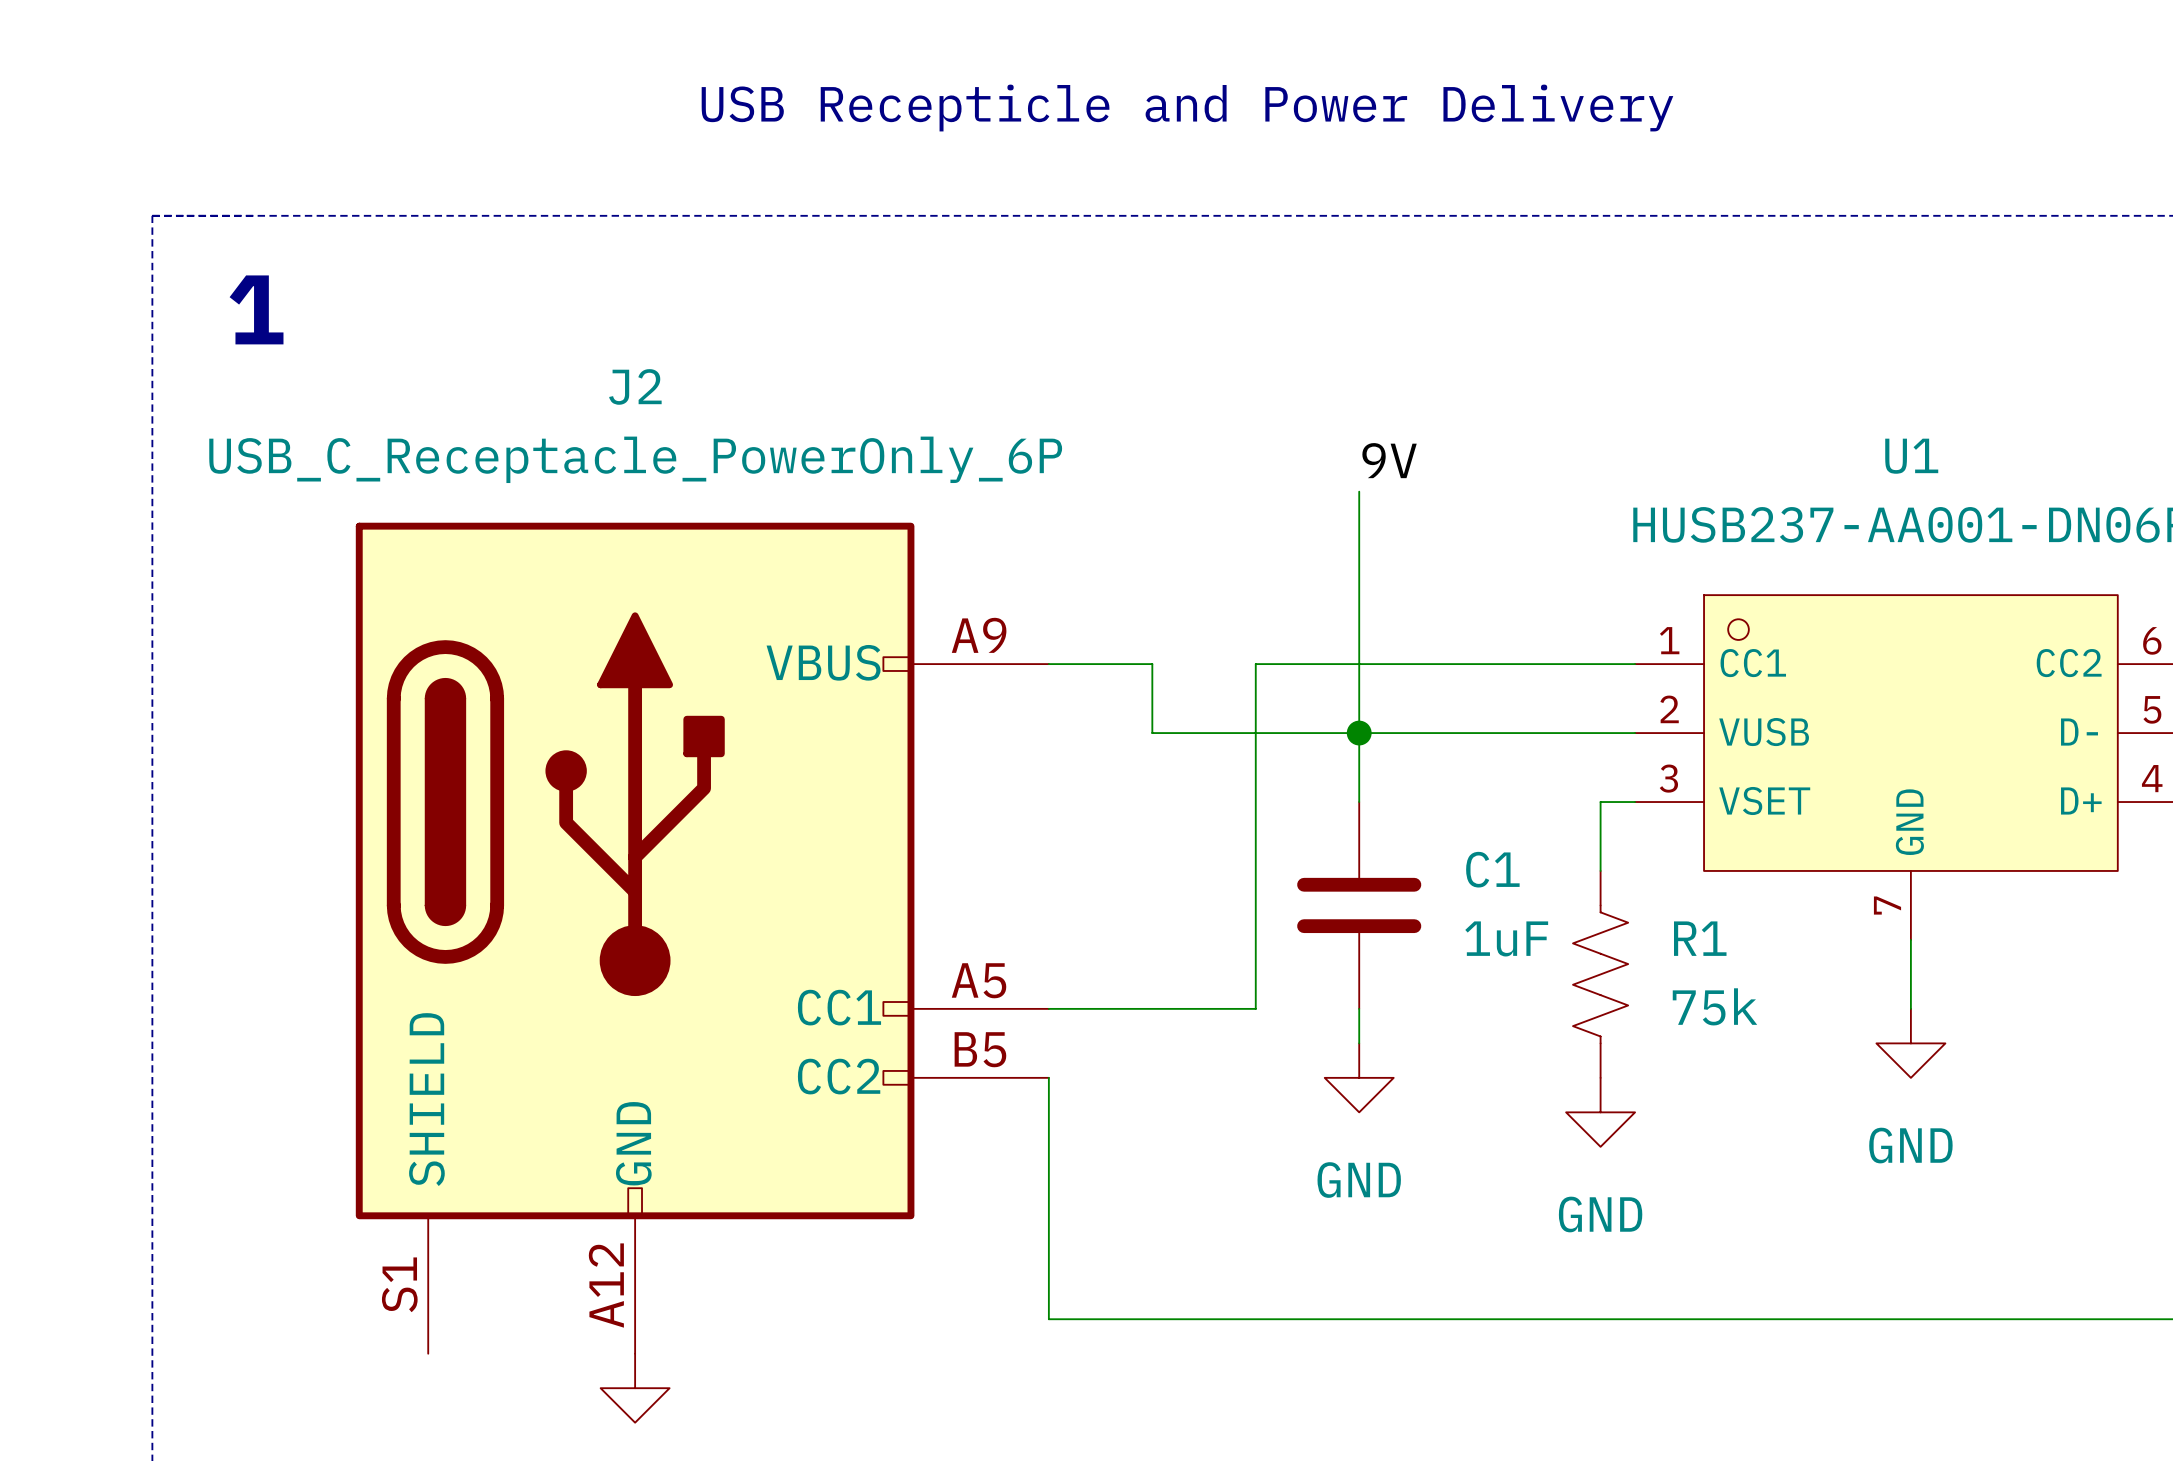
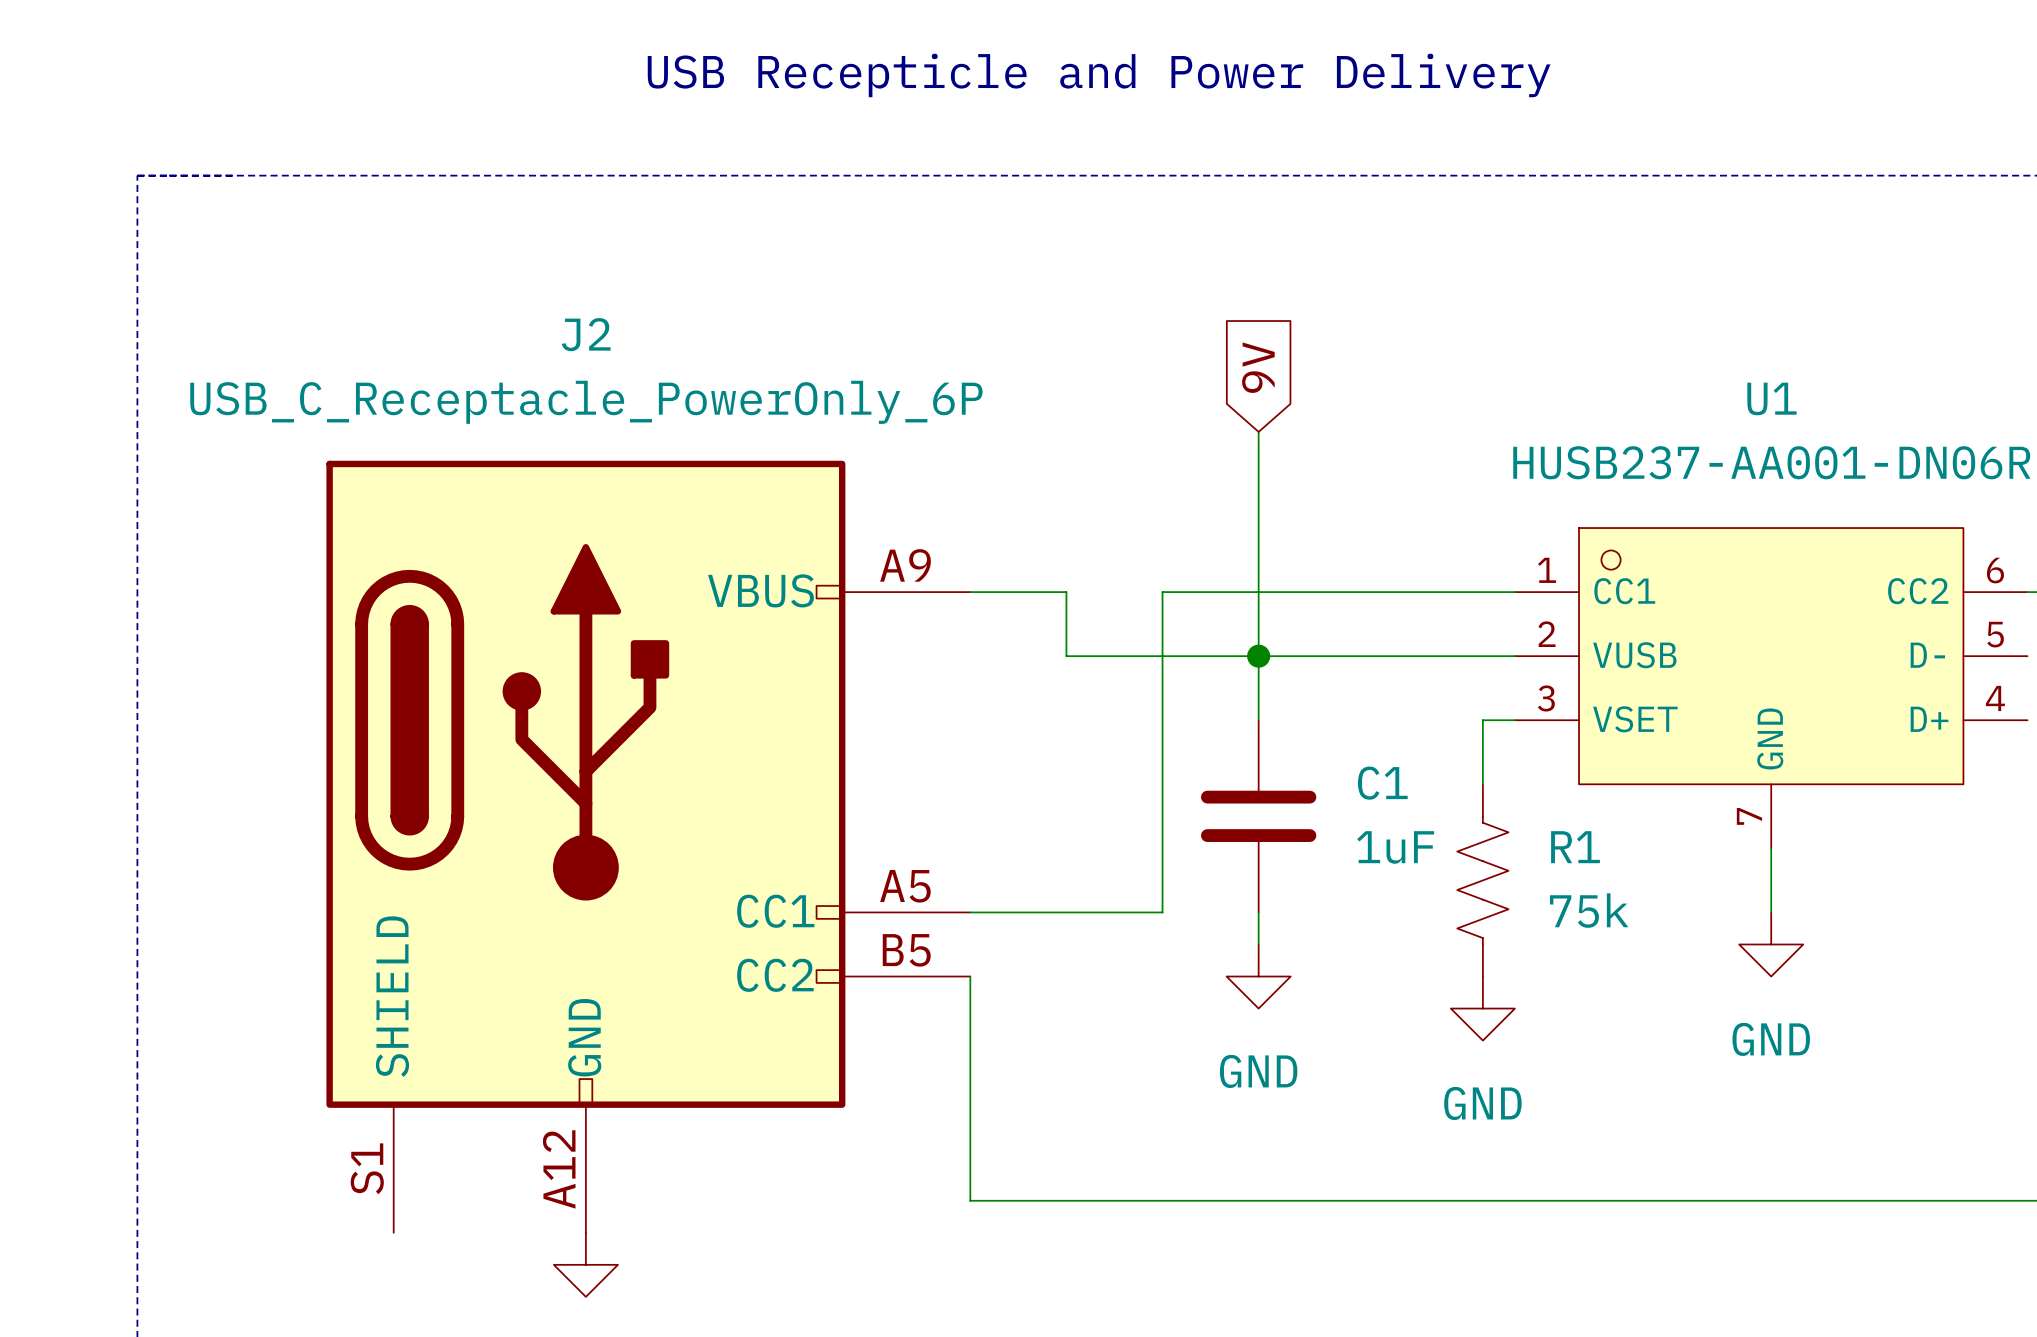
text: 1 (256, 309) -> none
global label: none -> 9V (1258, 367)
label: 9V (1389, 460) -> none

